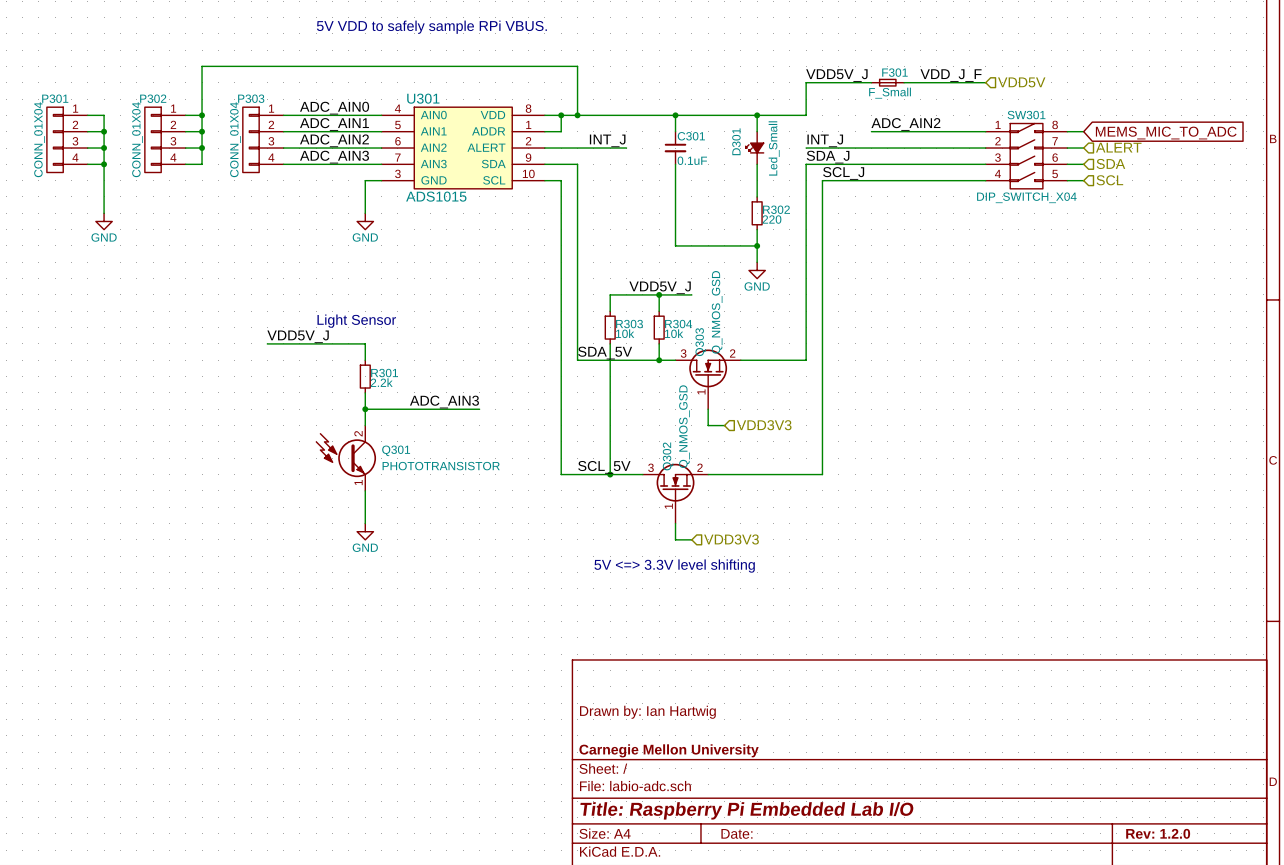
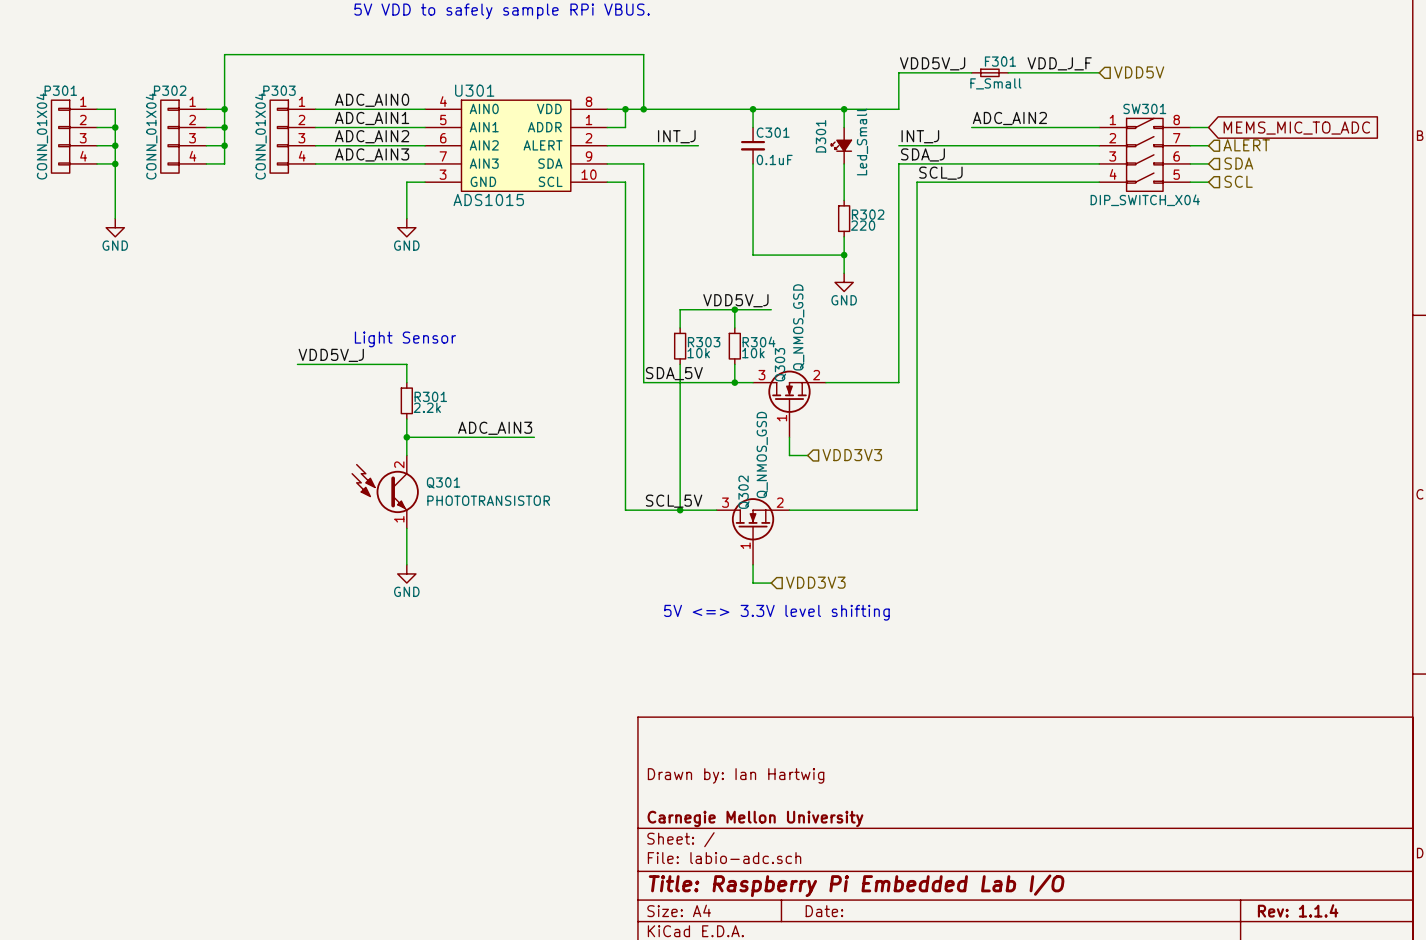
title block: Rev: 1.2.0 (1158, 833) -> Rev: 1.1.4 (1298, 910)

